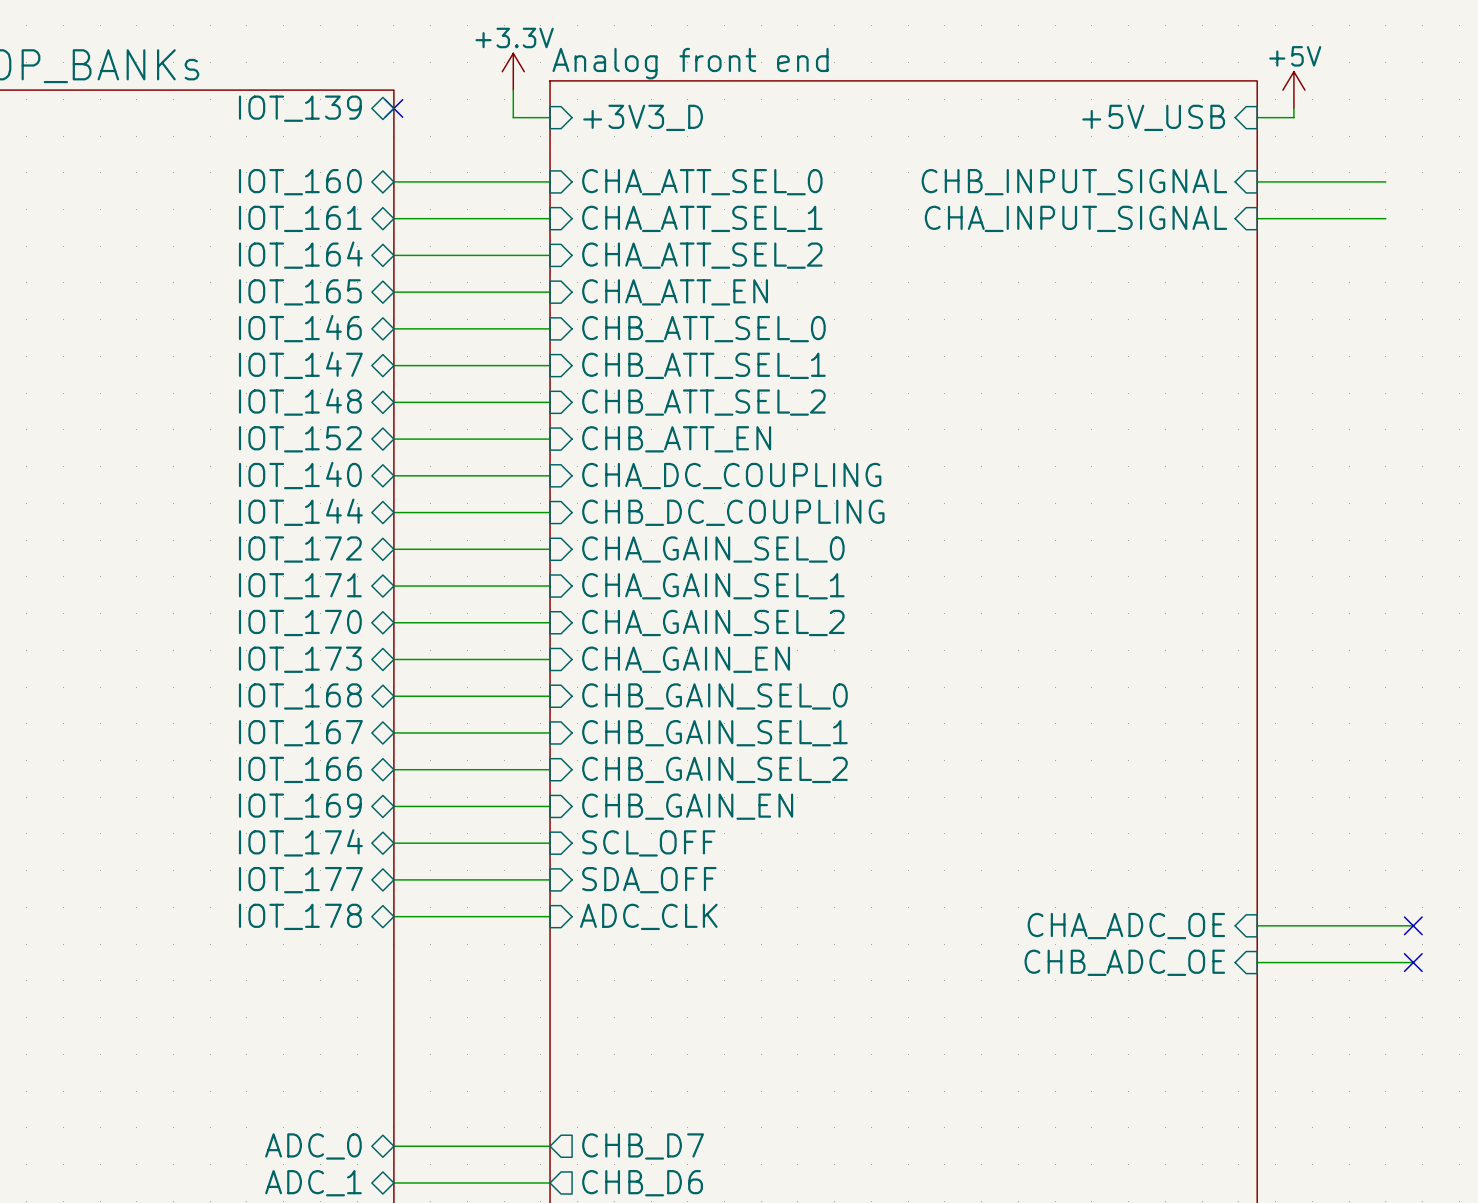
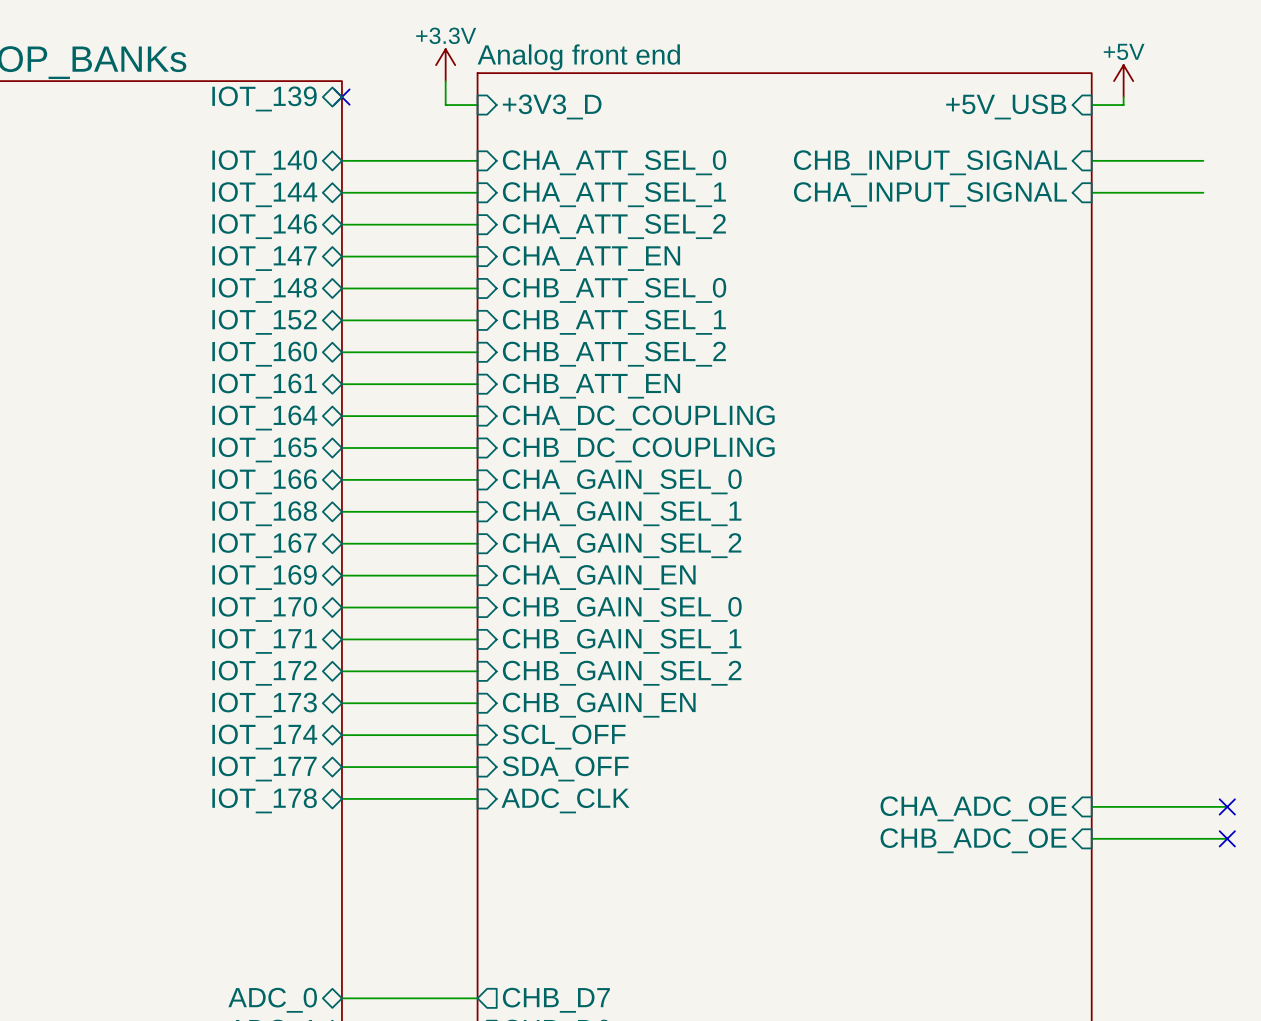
sheet pin: IOT_160 (300, 182) -> IOT_140 (264, 162)
sheet pin: IOT_161 (300, 218) -> IOT_144 (264, 194)
sheet pin: IOT_164 (300, 255) -> IOT_146 (264, 226)
sheet pin: IOT_165 (300, 292) -> IOT_147 (264, 258)
sheet pin: IOT_146 (300, 328) -> IOT_148 (264, 290)
sheet pin: IOT_147 (300, 365) -> IOT_152 (264, 322)
sheet pin: IOT_148 (300, 402) -> IOT_160 (264, 354)
sheet pin: IOT_152 (300, 439) -> IOT_161 (264, 386)
sheet pin: IOT_140 (300, 475) -> IOT_164 (264, 418)
sheet pin: IOT_144 (300, 512) -> IOT_165 (264, 449)
sheet pin: IOT_172 (300, 549) -> IOT_166 (264, 481)
sheet pin: IOT_171 (300, 586) -> IOT_168 (264, 513)
sheet pin: IOT_170 (300, 622) -> IOT_167 (264, 545)
sheet pin: IOT_173 (300, 659) -> IOT_169 (264, 577)
sheet pin: IOT_168 (300, 696) -> IOT_170 (264, 609)
sheet pin: IOT_167 (300, 733) -> IOT_171 (264, 641)
sheet pin: IOT_166 (300, 769) -> IOT_172 (264, 673)
sheet pin: IOT_169 (300, 806) -> IOT_173 (264, 705)

